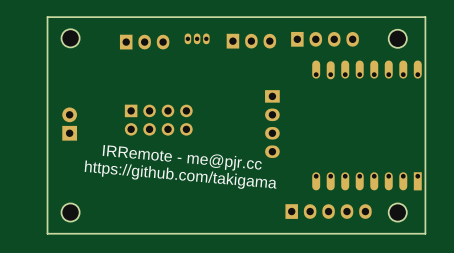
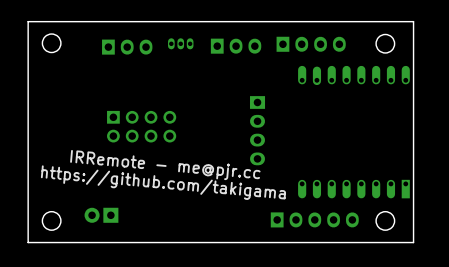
part rotation: 0° (69, 124) -> 90° counterclockwise (101, 215)
part position: (69, 124) -> (101, 215)

